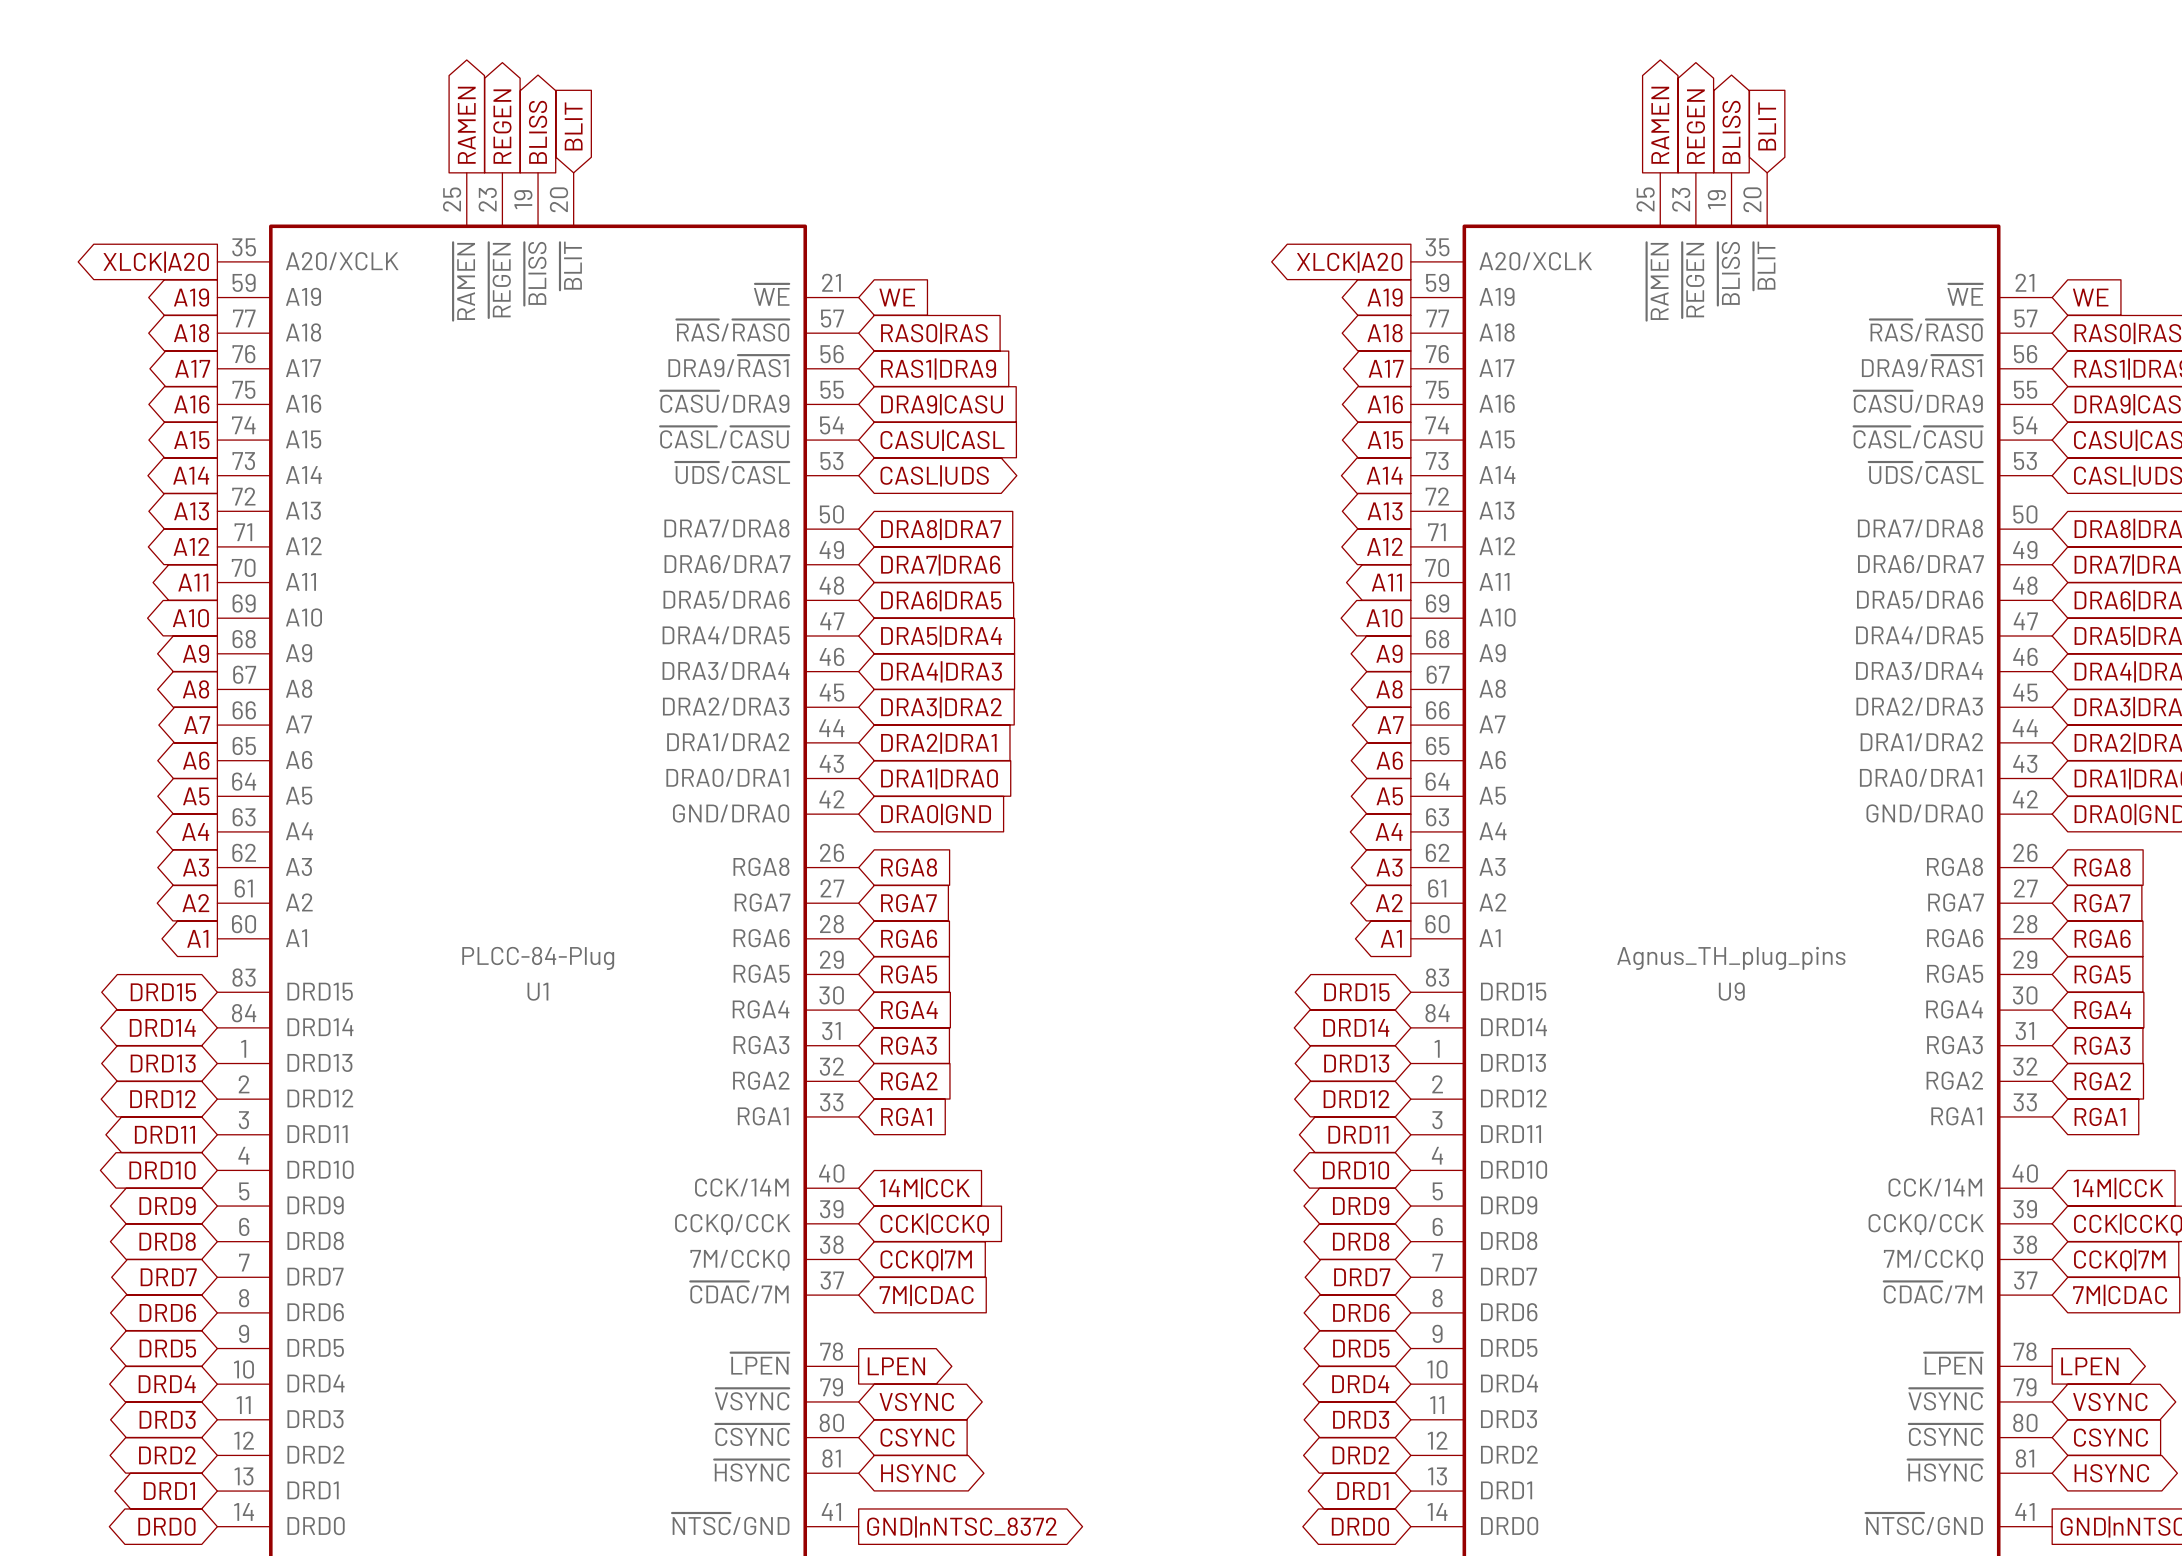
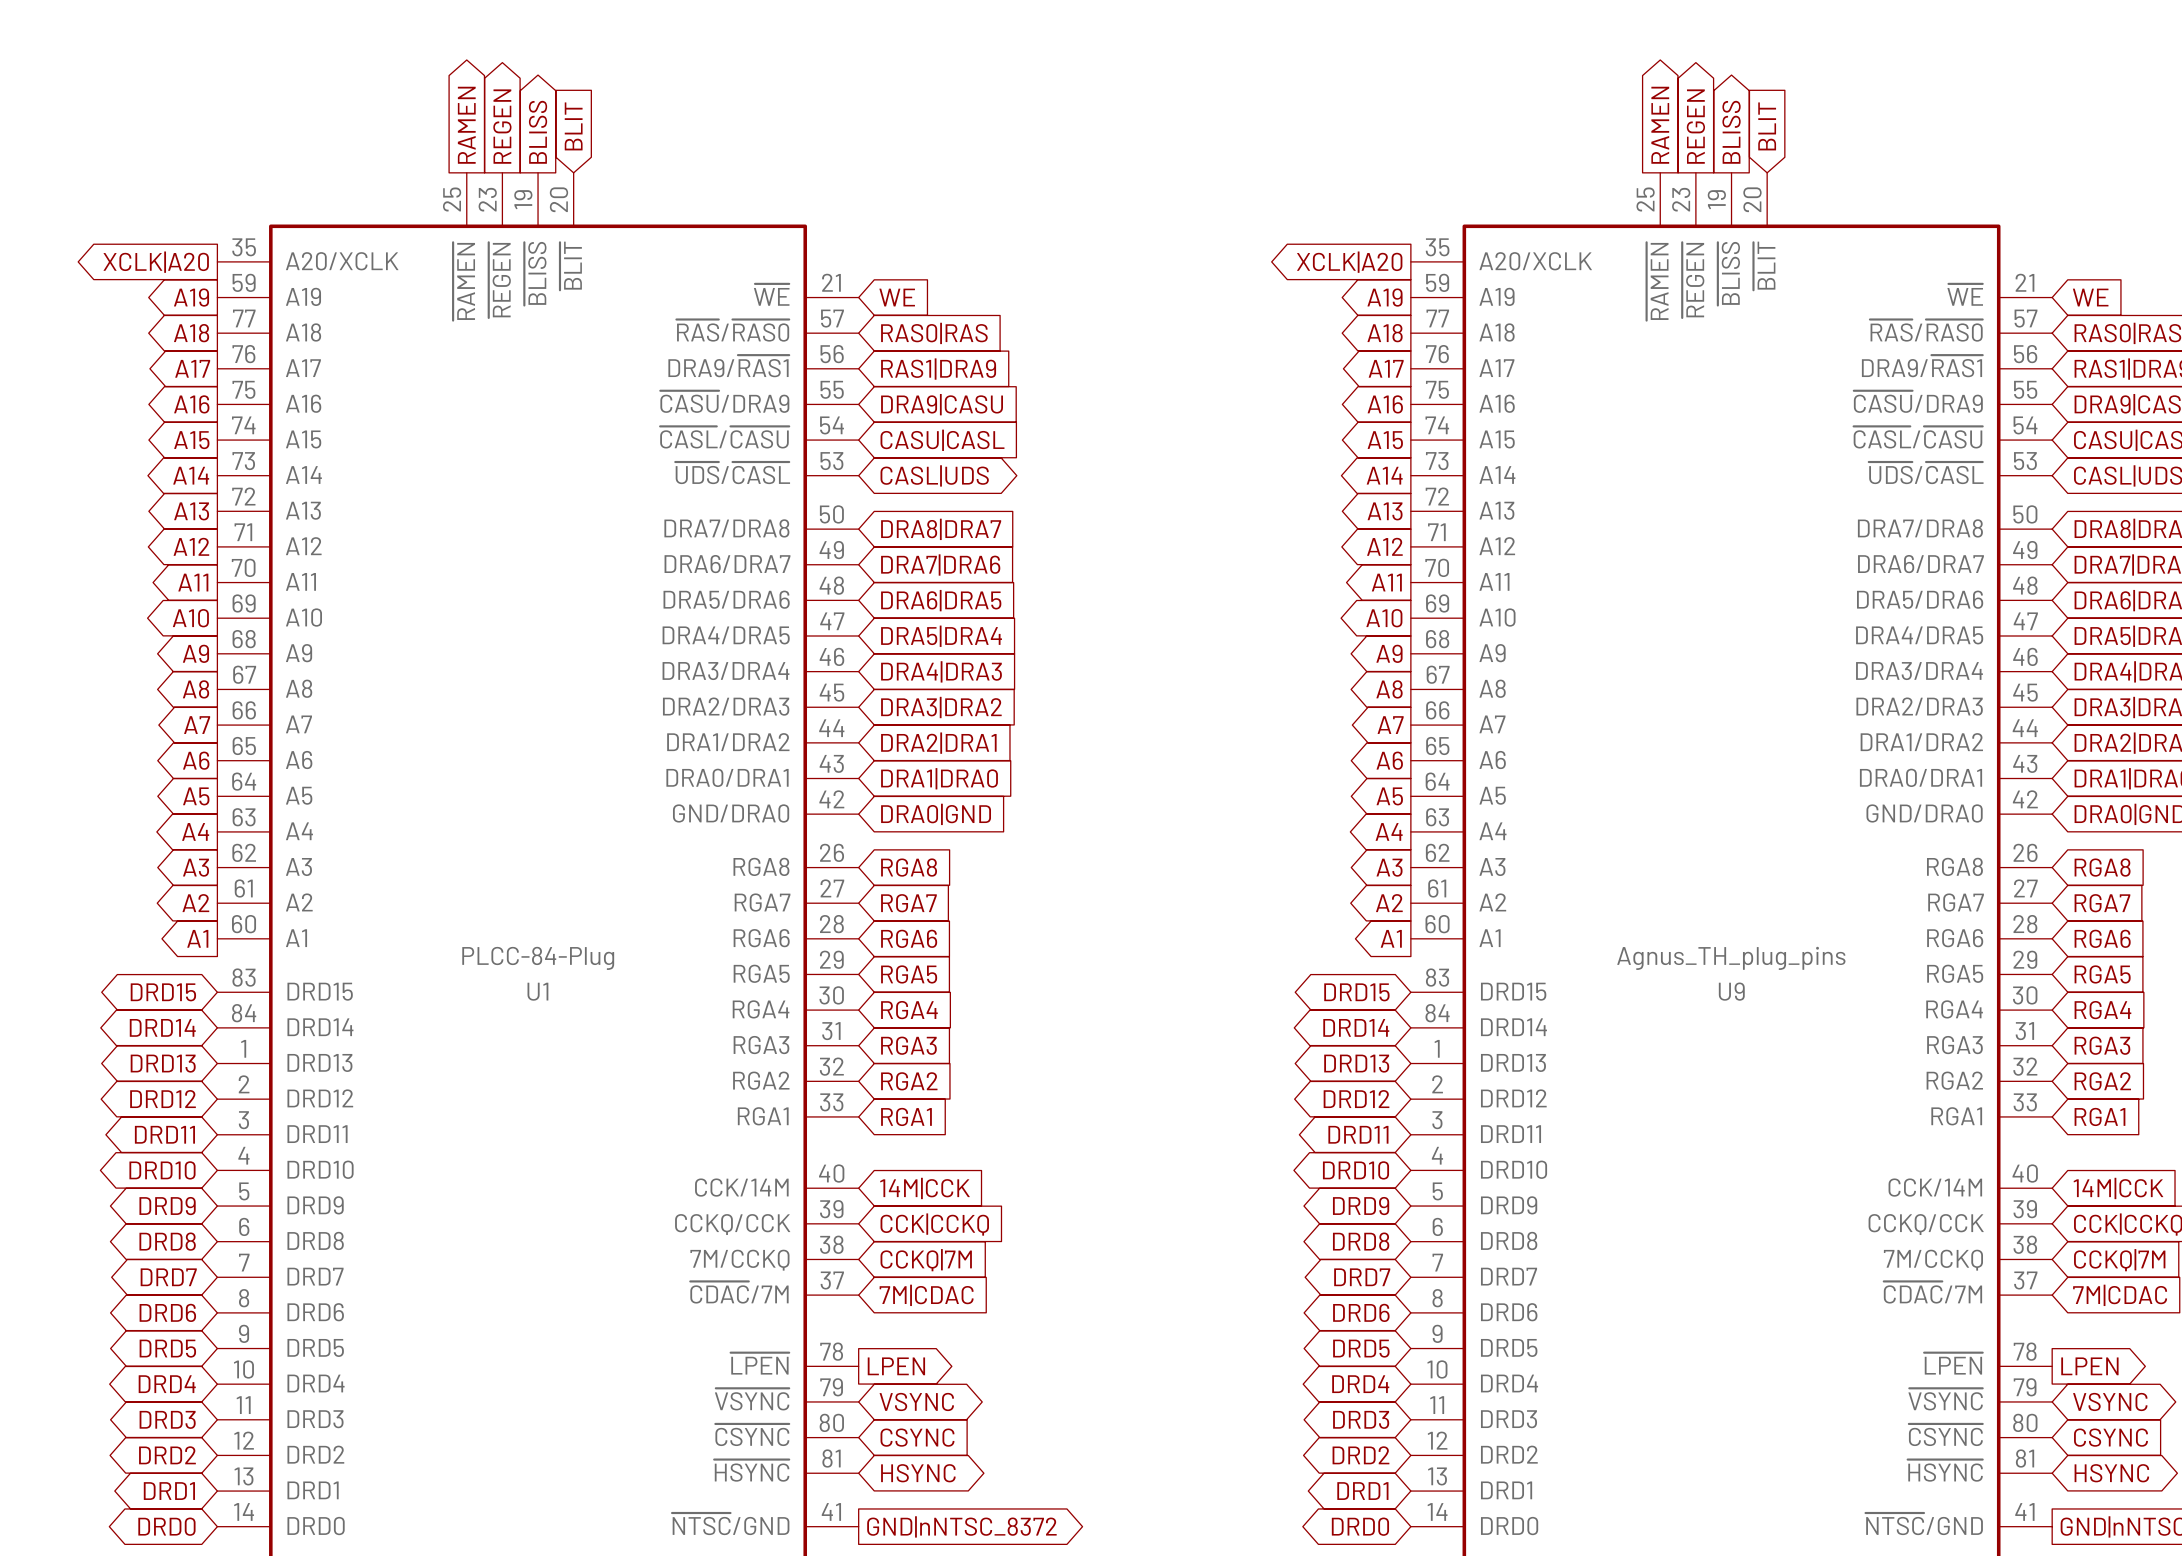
global label: XLCK|A20 (156, 262) -> XCLK|A20 (156, 262)
global label: XLCK|A20 (1349, 262) -> XCLK|A20 (1349, 262)

